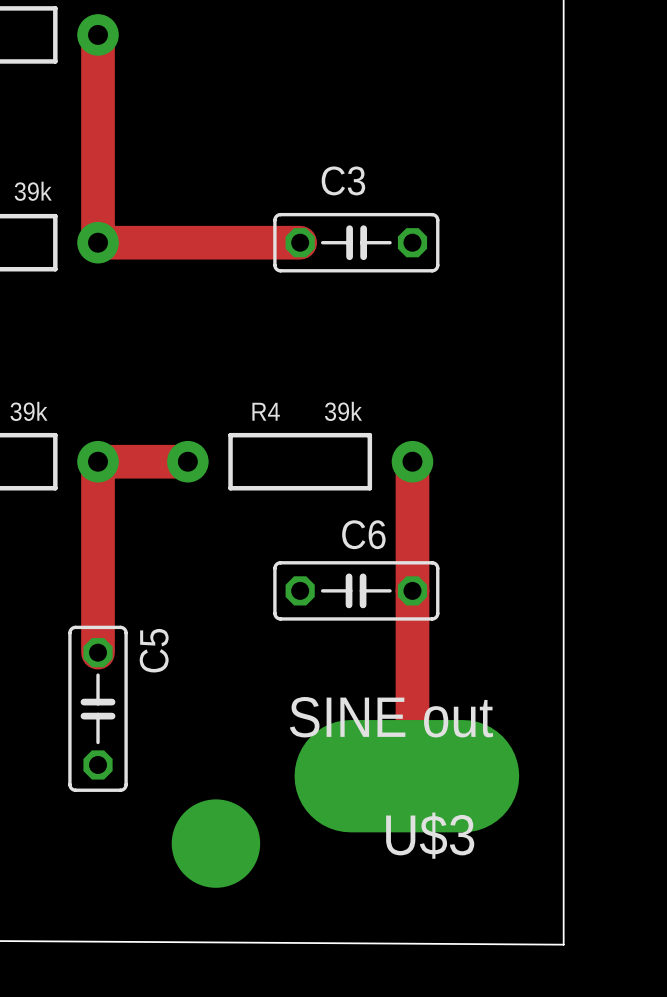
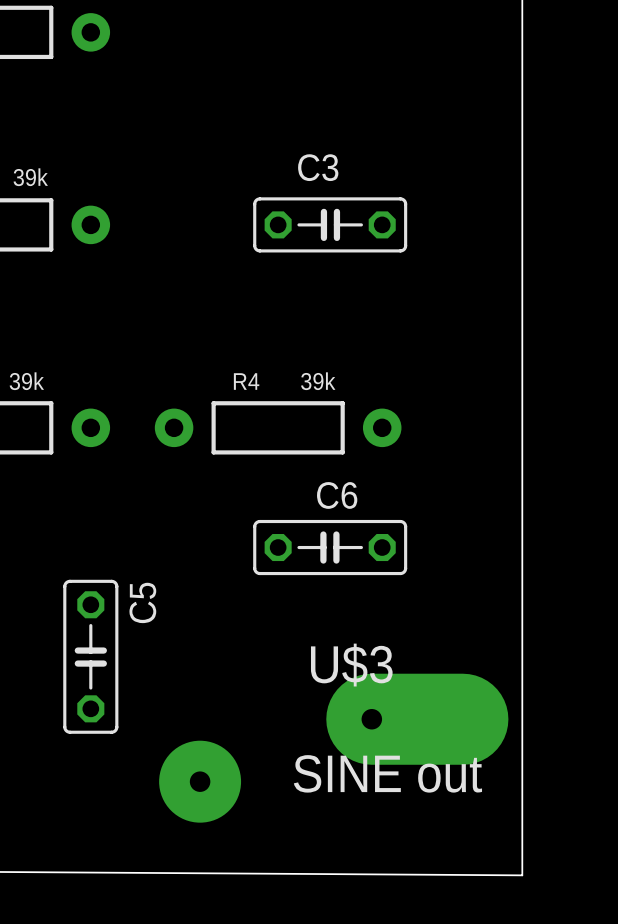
track: (98, 34) (98, 242) (300, 242) -> none
track: (187, 461) (98, 461) (98, 652) -> none
track: (412, 461) (412, 776) (406, 776) -> none
U$3 value position: SINE out (391, 717) -> SINE out (387, 773)
U$3 footprint: [294, 720, 520, 833] -> [326, 673, 509, 765]
part footprint: [171, 799, 261, 888] -> [159, 740, 242, 823]
U$3 name position: U$3 (430, 835) -> U$3 (351, 665)

